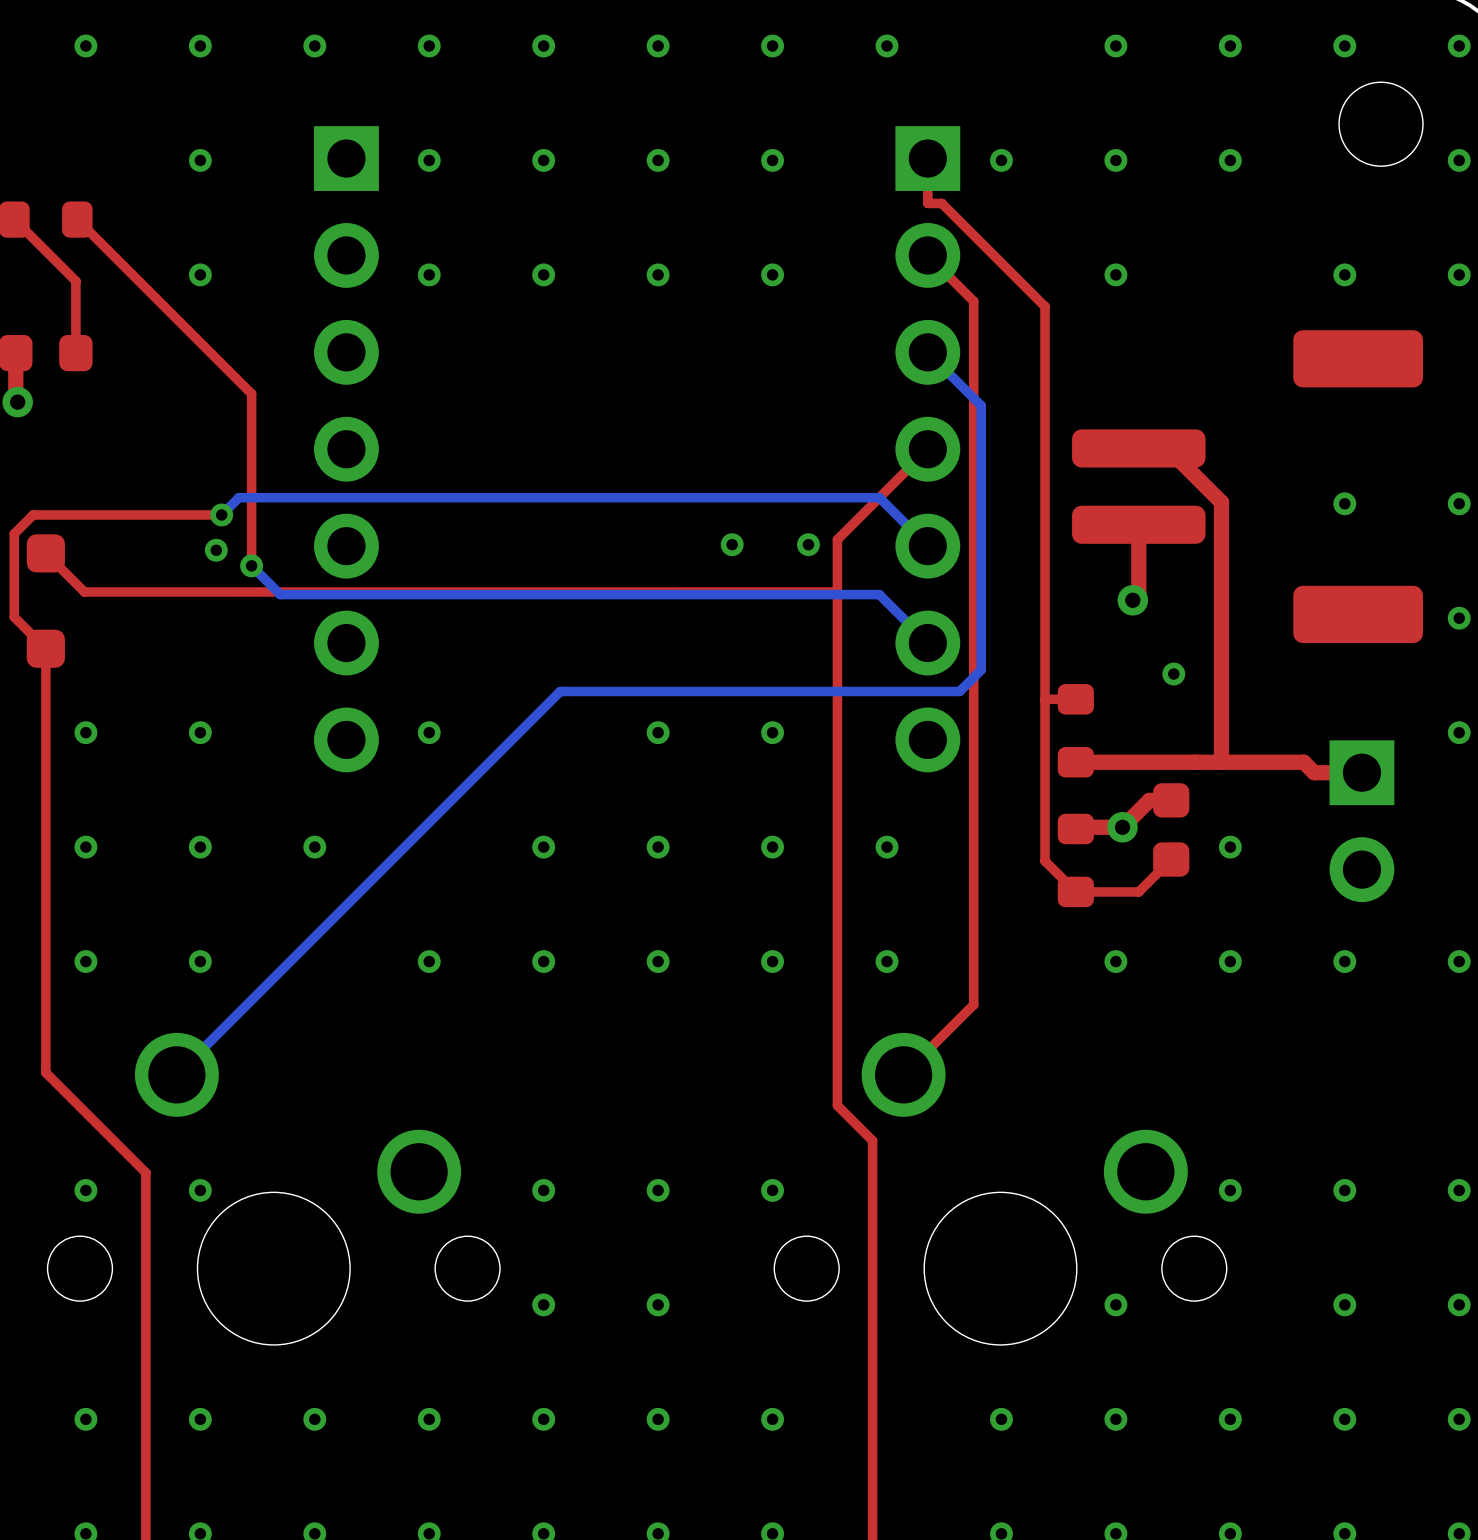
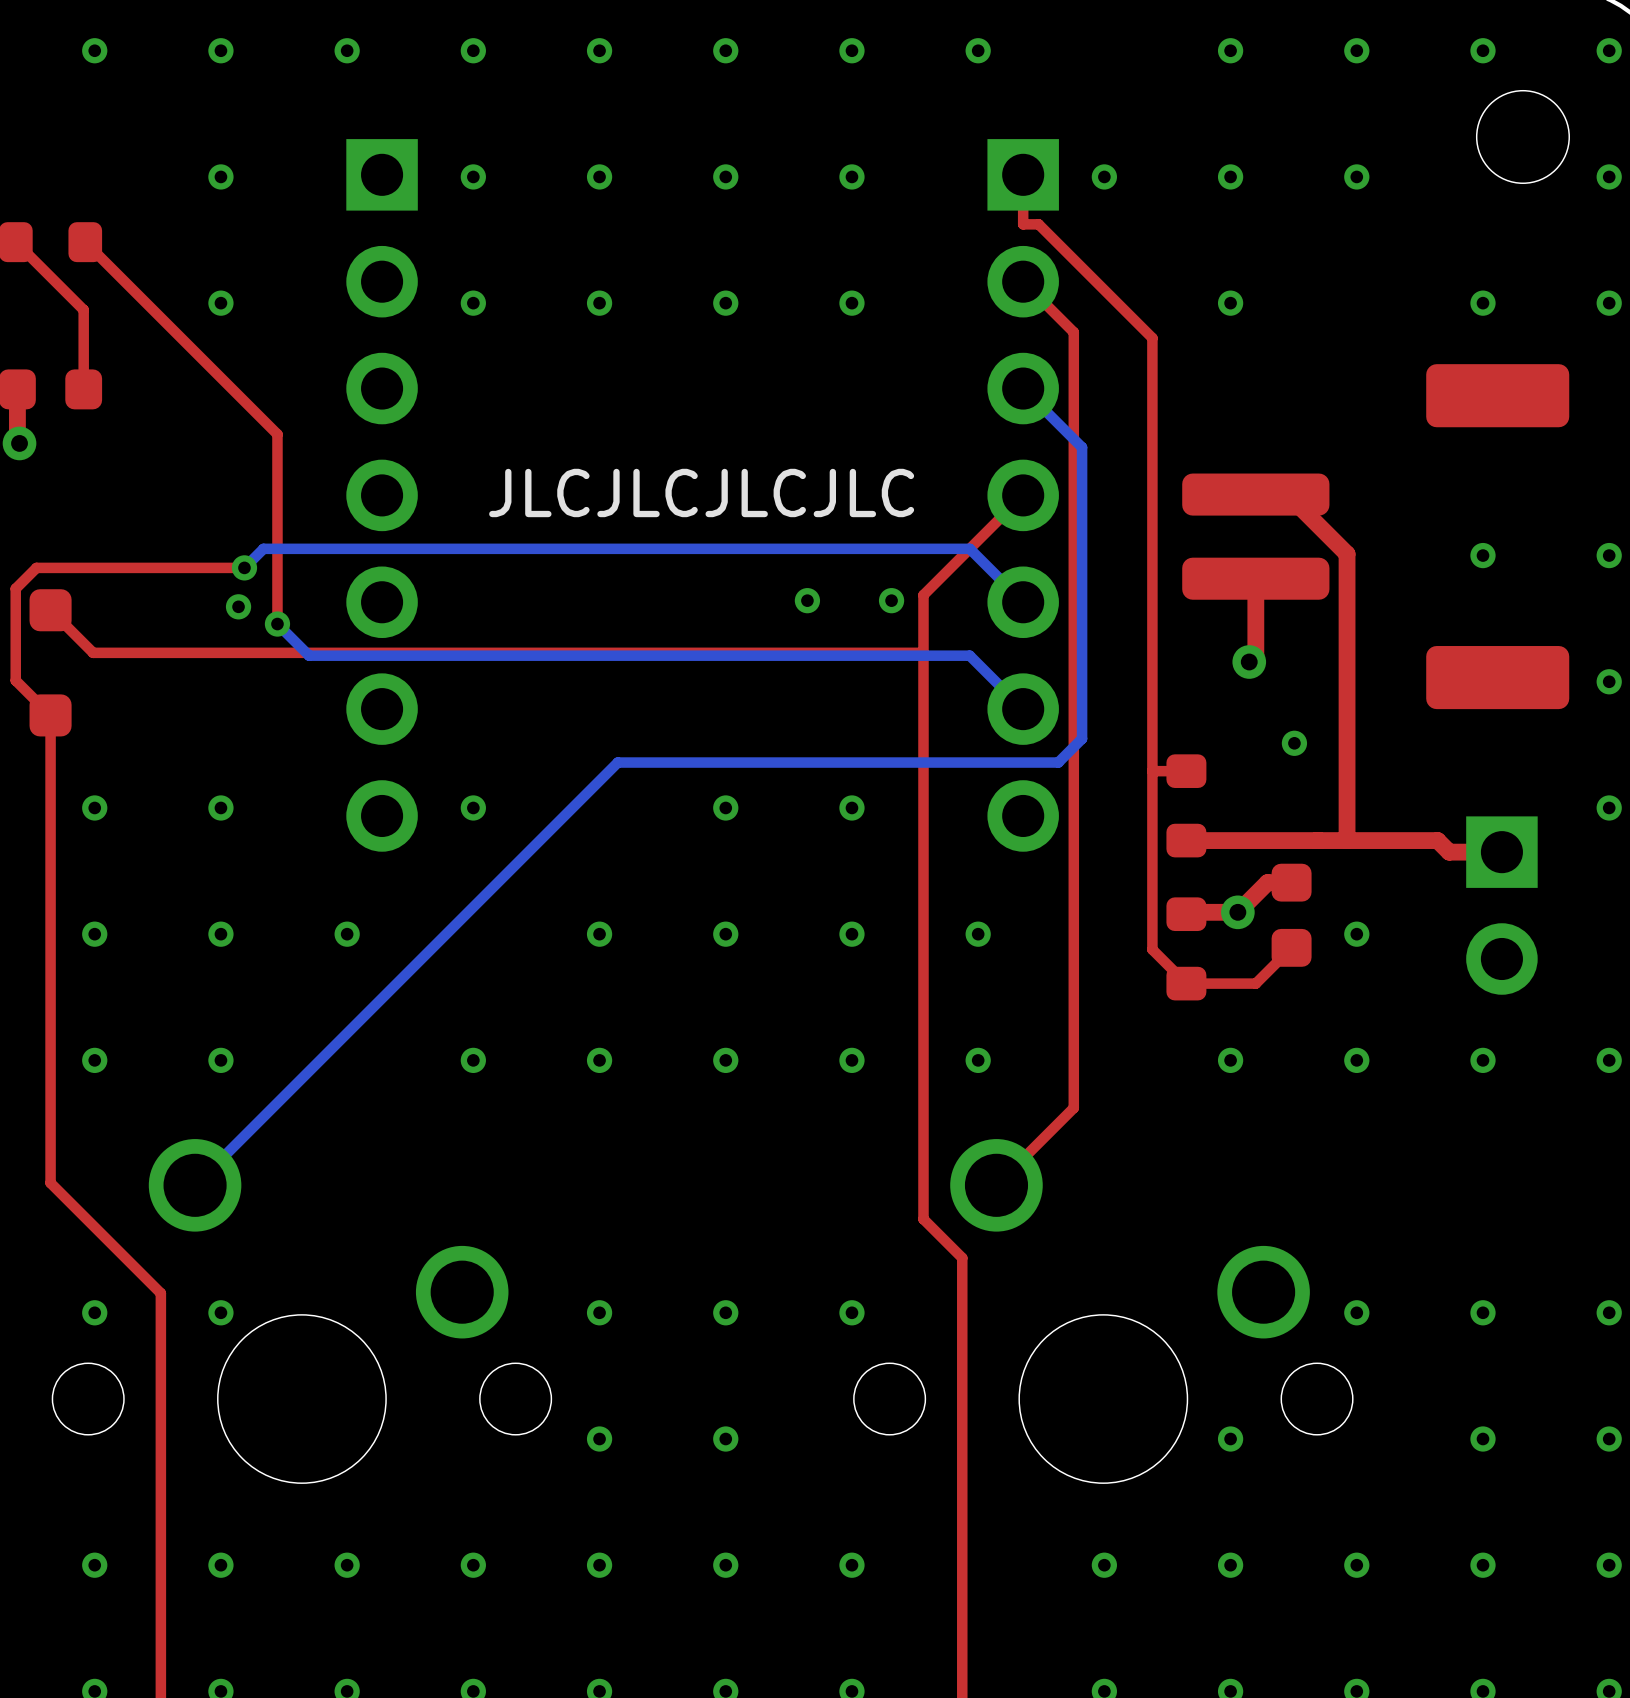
text: none -> JLCJLCJLCJLC (701, 492)

